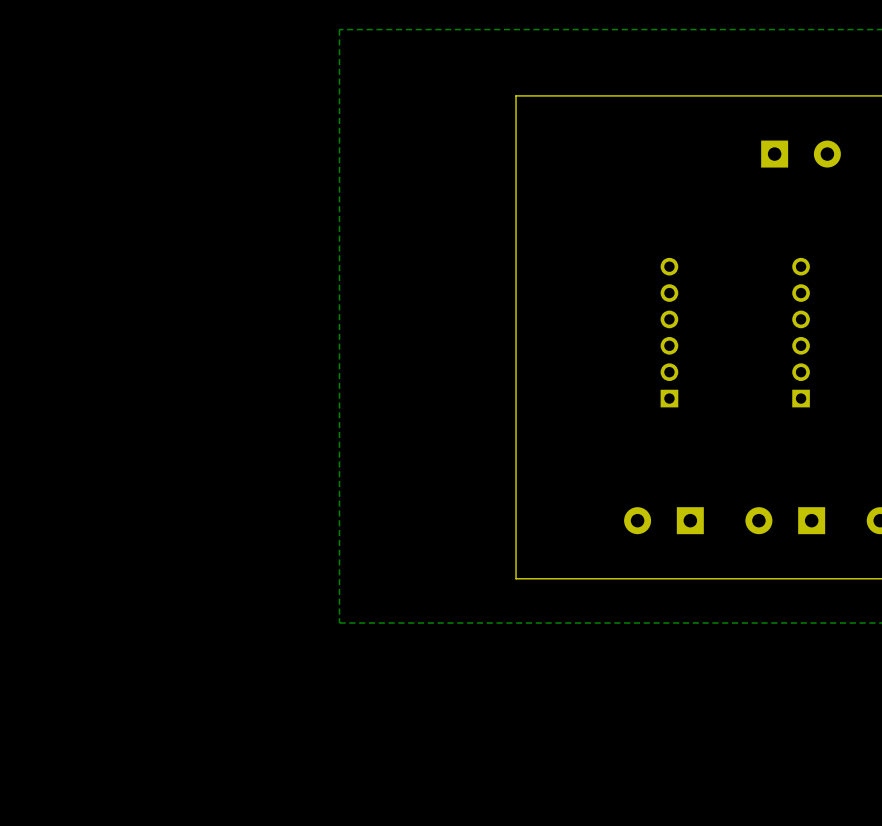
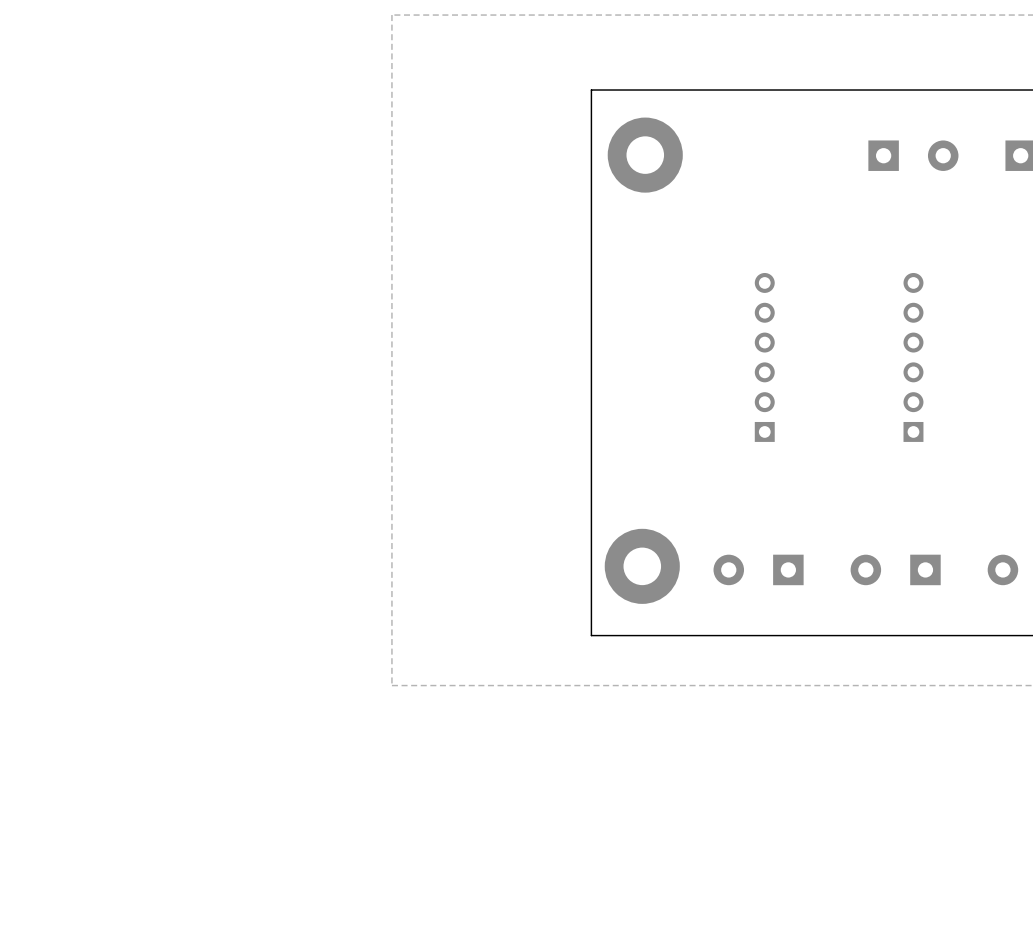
part: none -> (645, 155)
part: none -> (642, 566)

